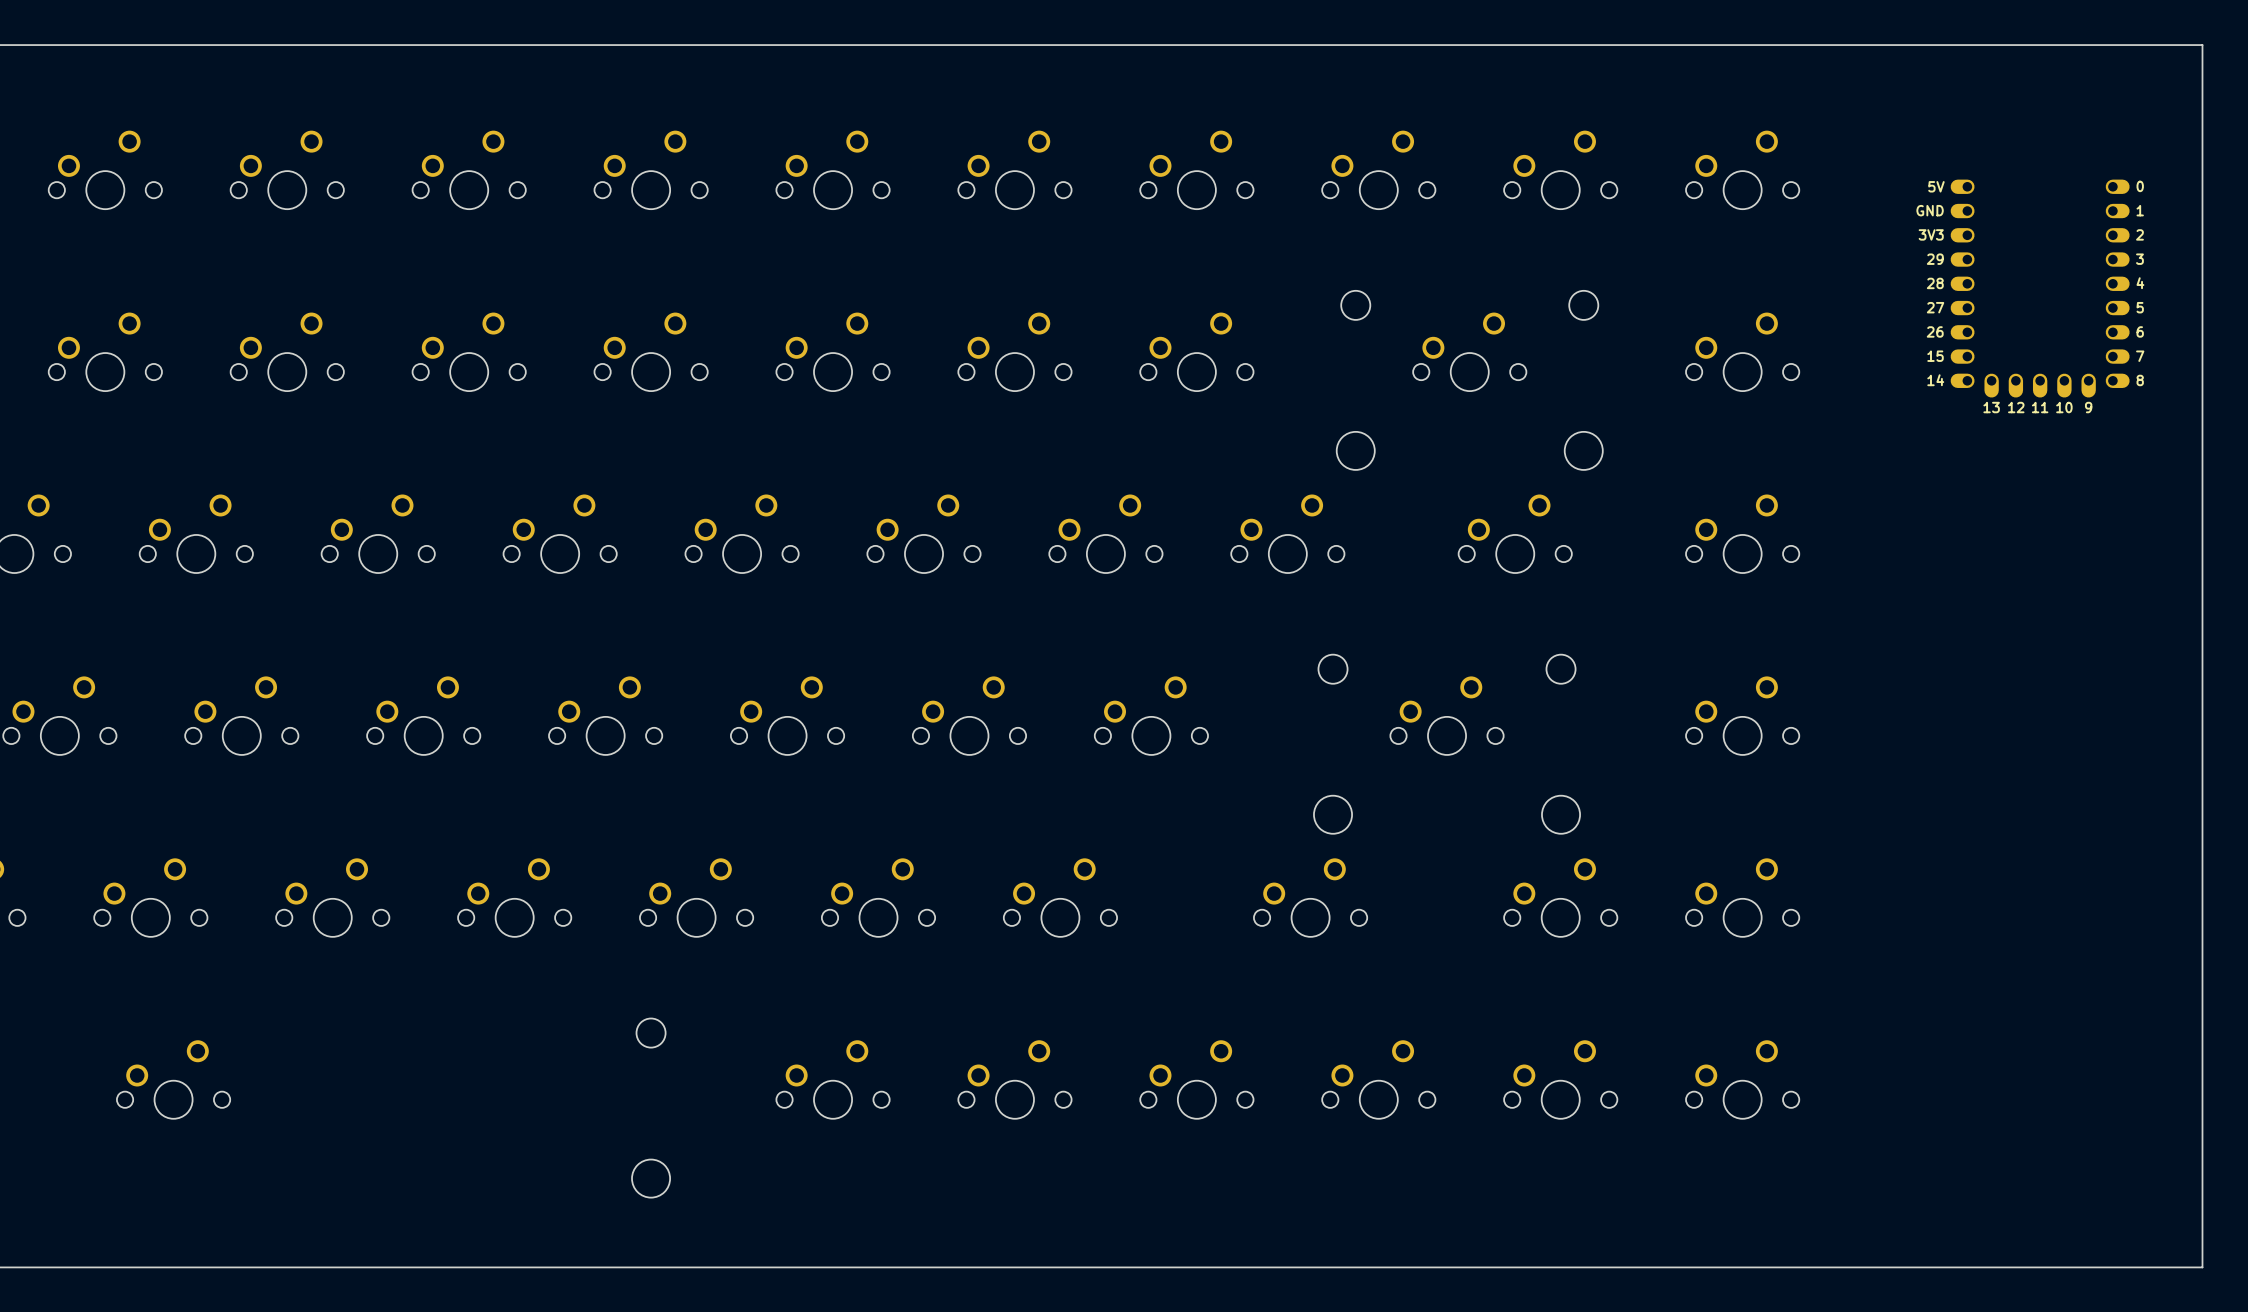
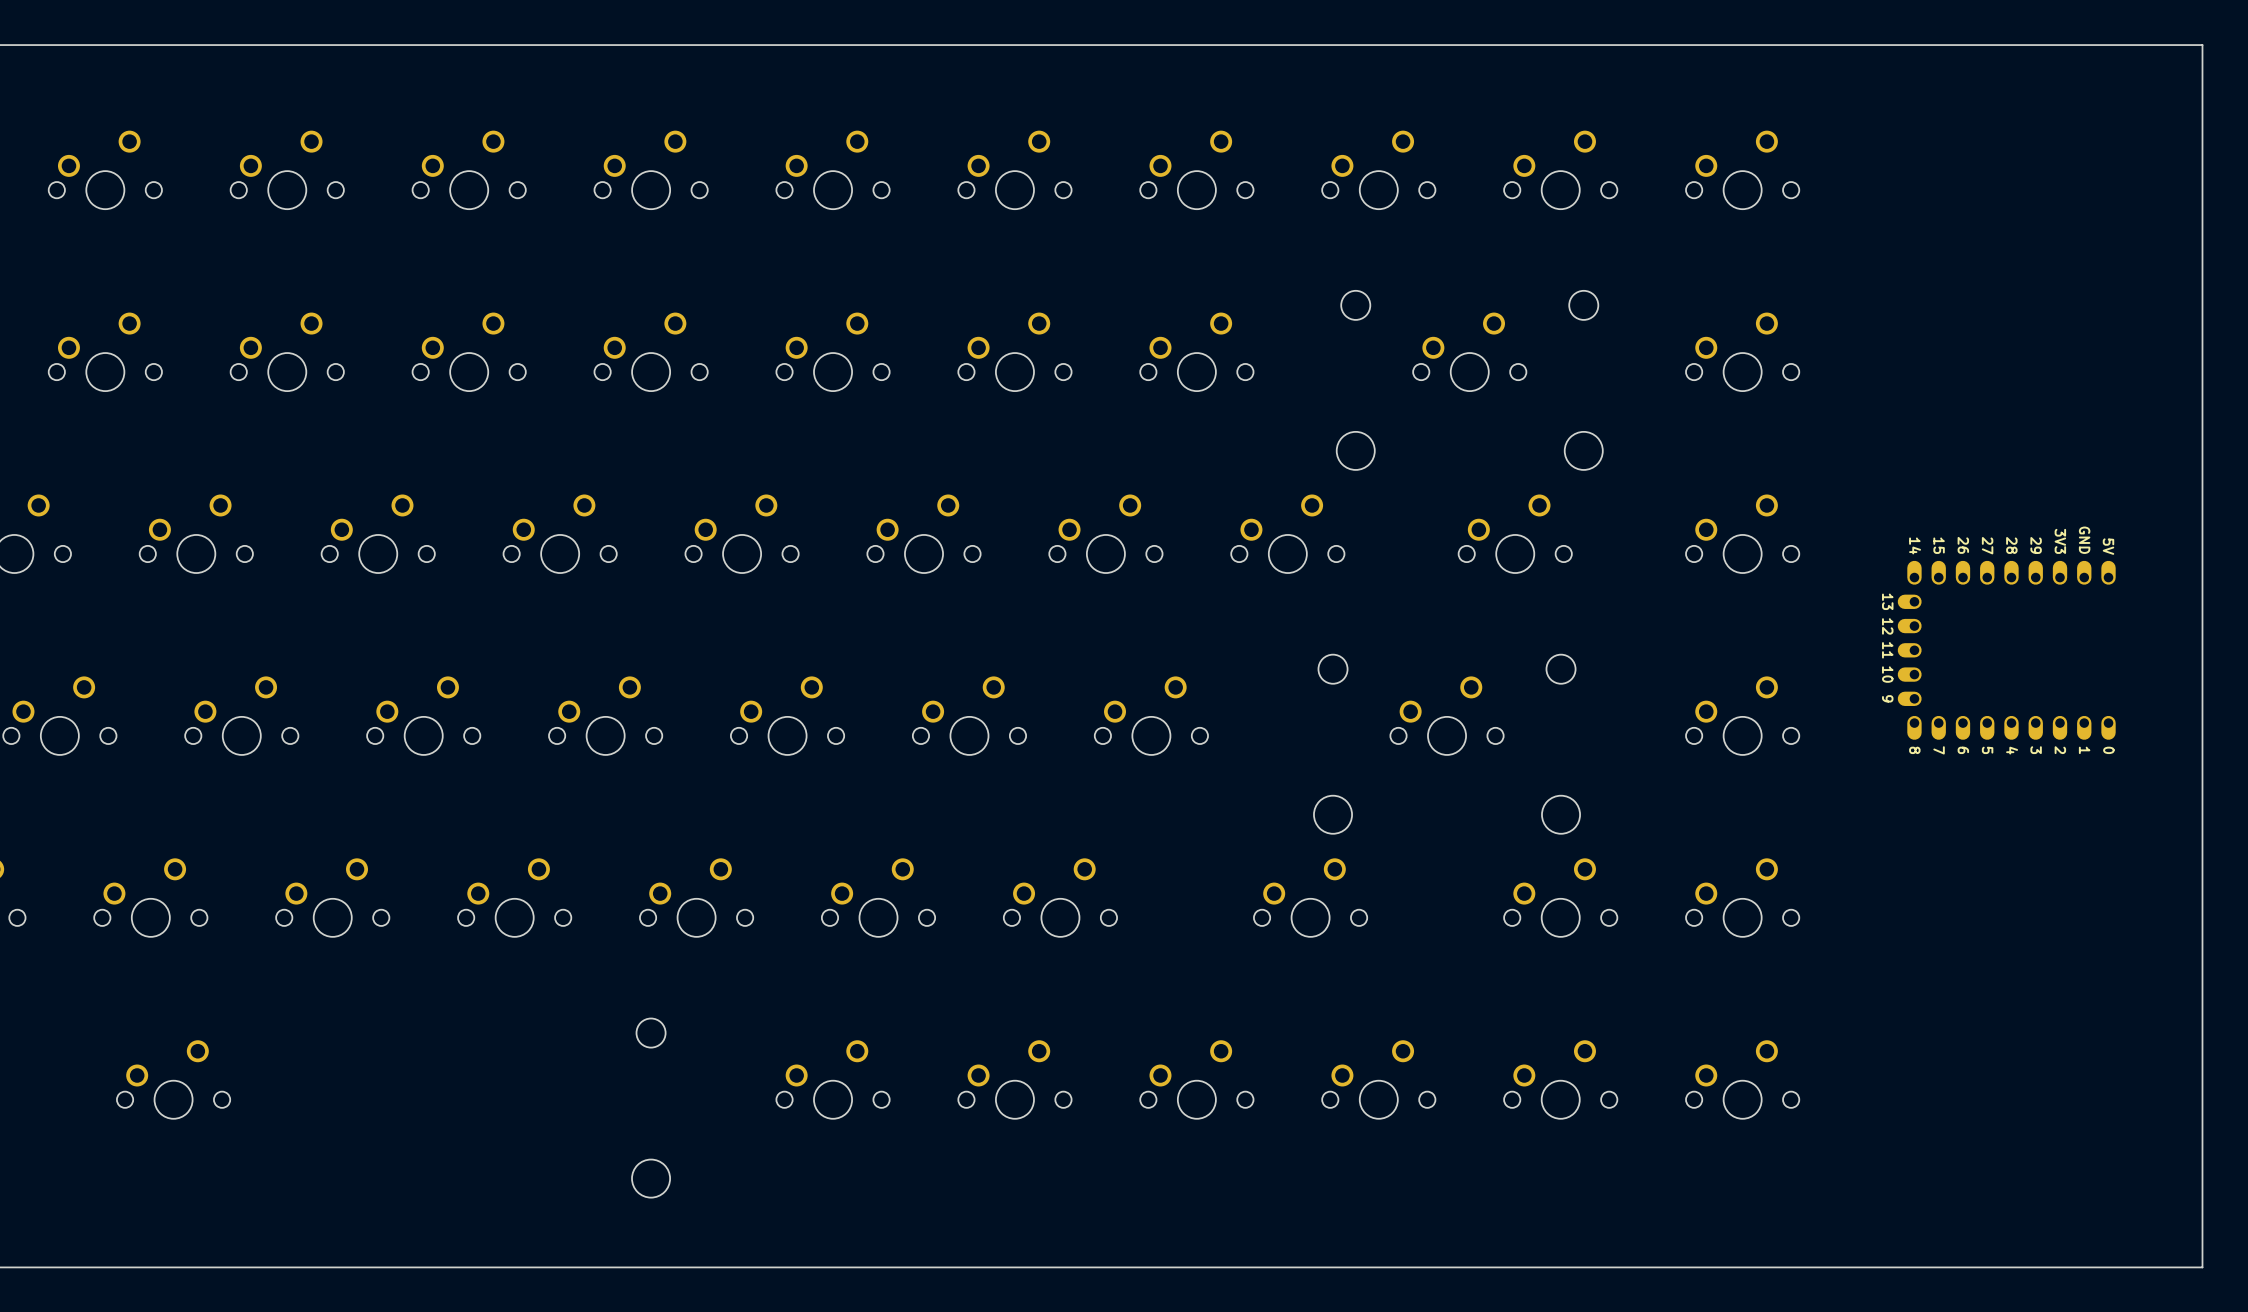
part: (2040, 288) -> none
part: none -> (2006, 650)

